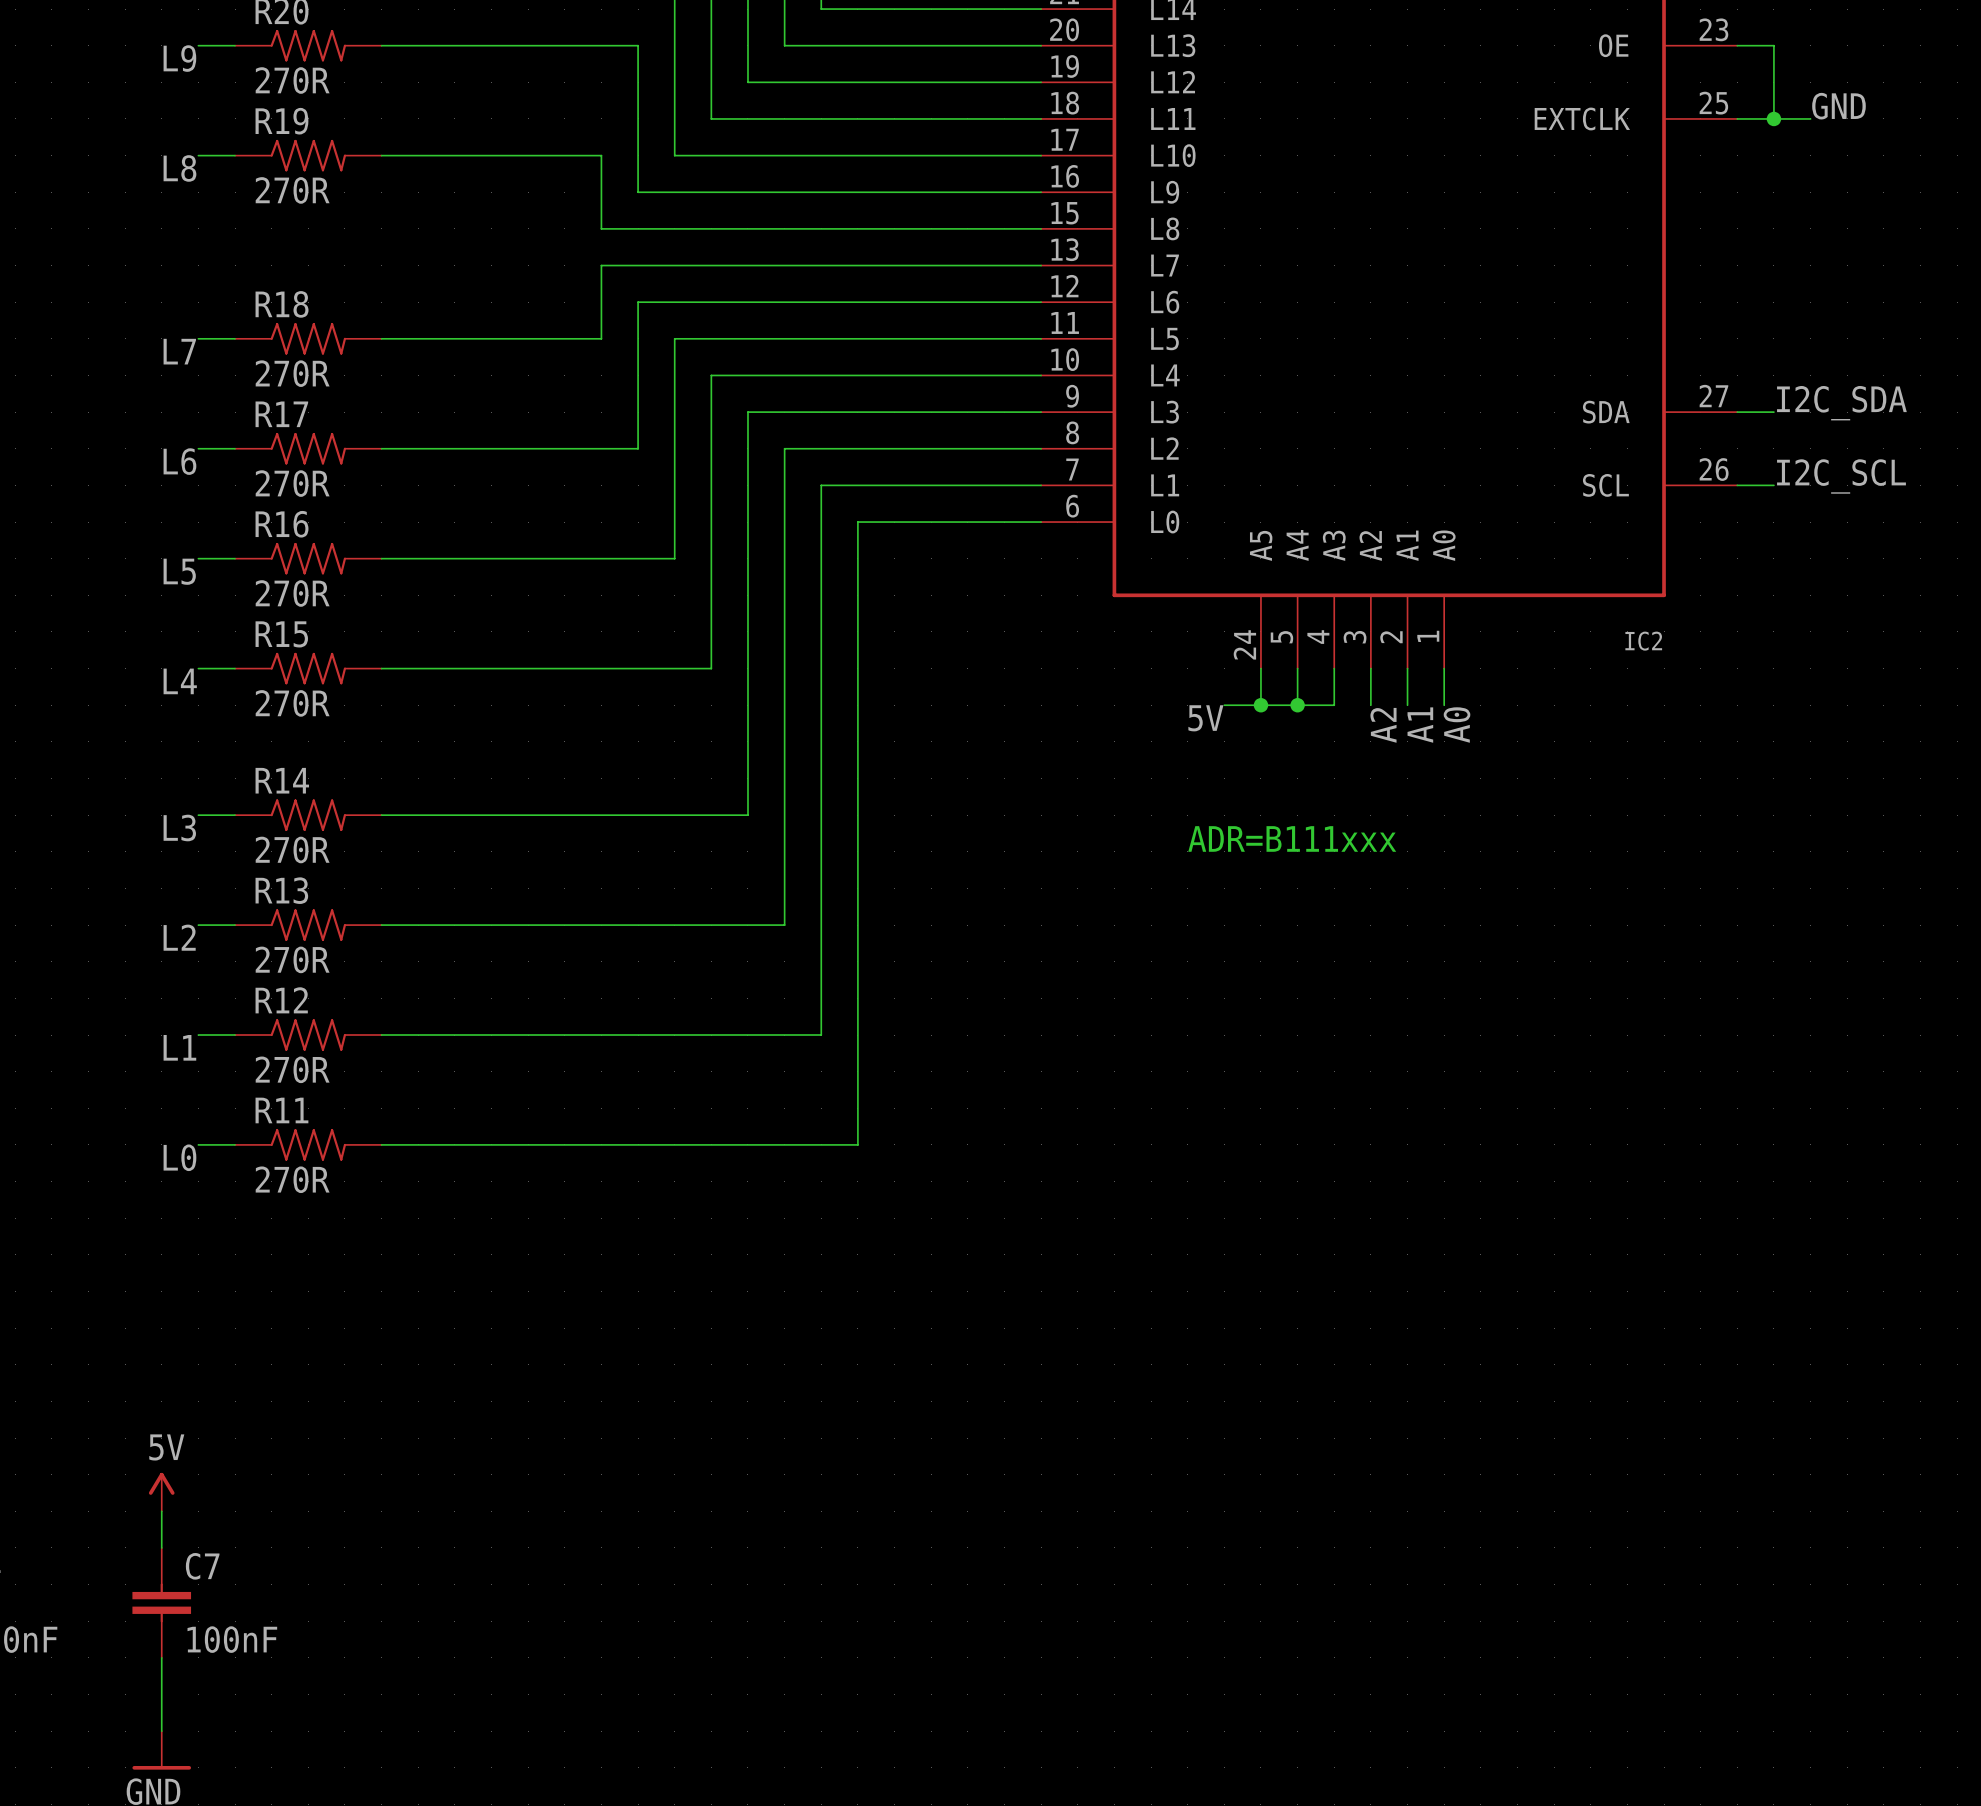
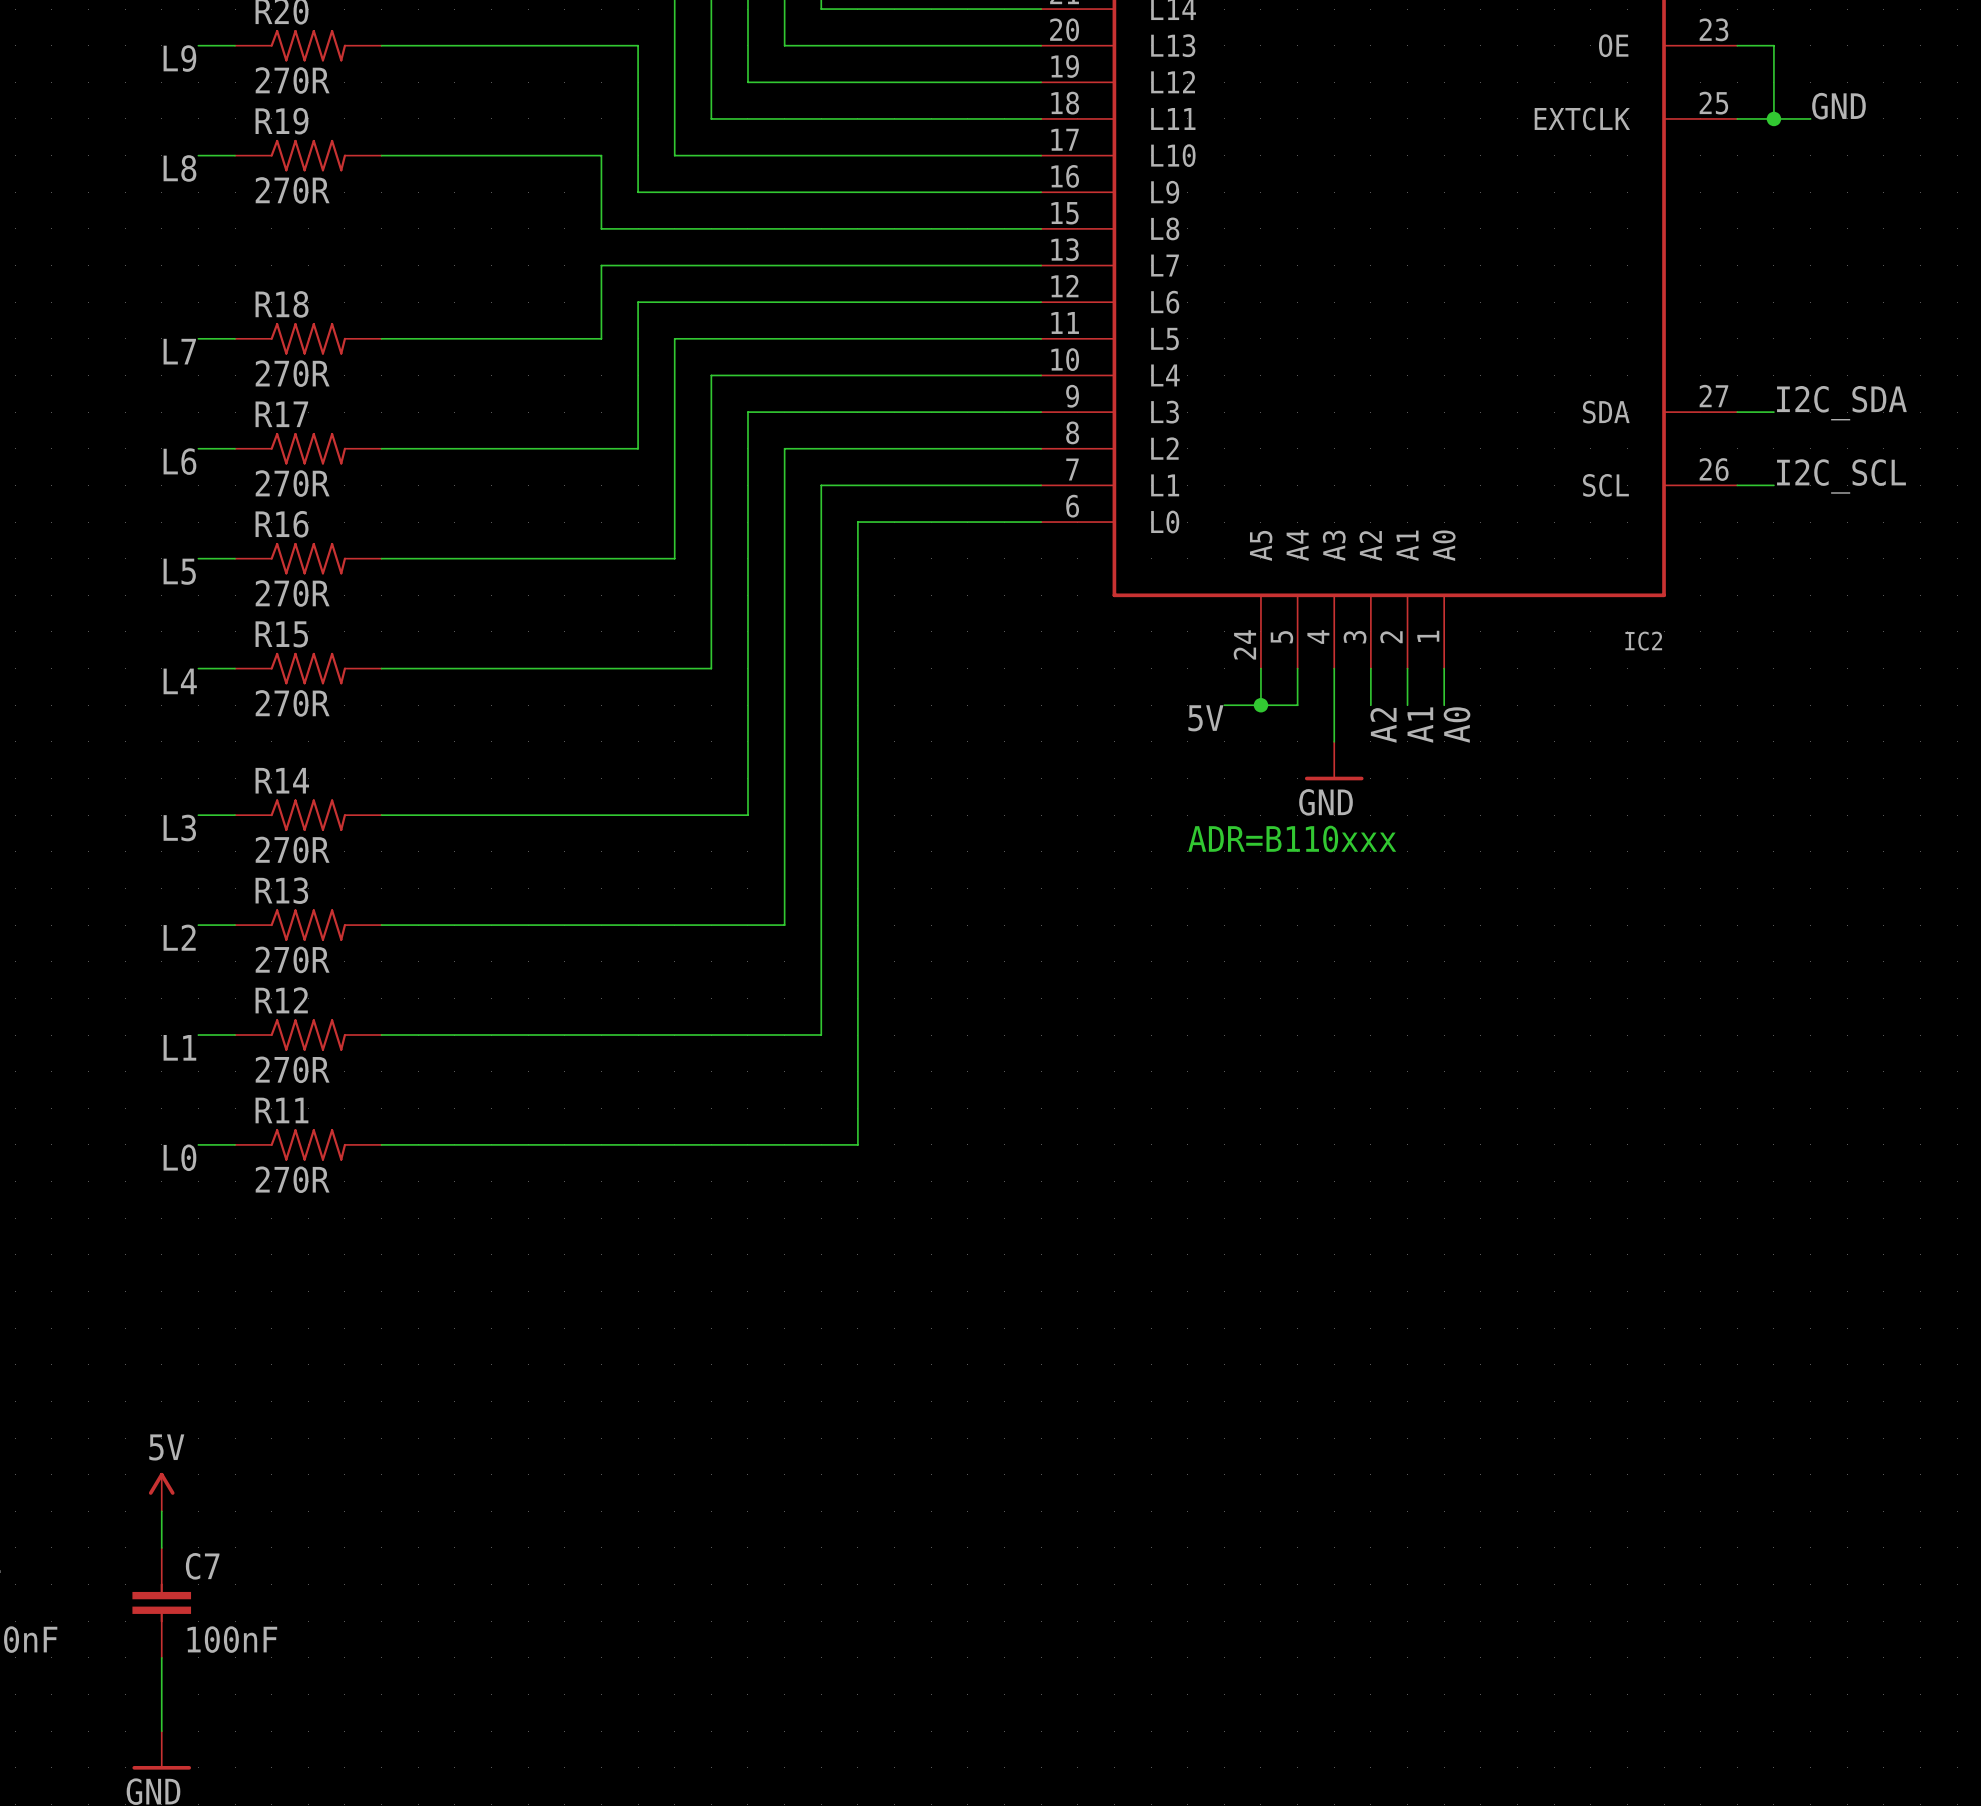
wire: (1297, 705) (1334, 705) -> (1334, 741) (1334, 705)
junction: (1297, 705) -> none
power symbol: none -> GND (1334, 761)
text: ADR=B111xxx (1292, 838) -> ADR=B110xxx (1292, 838)

